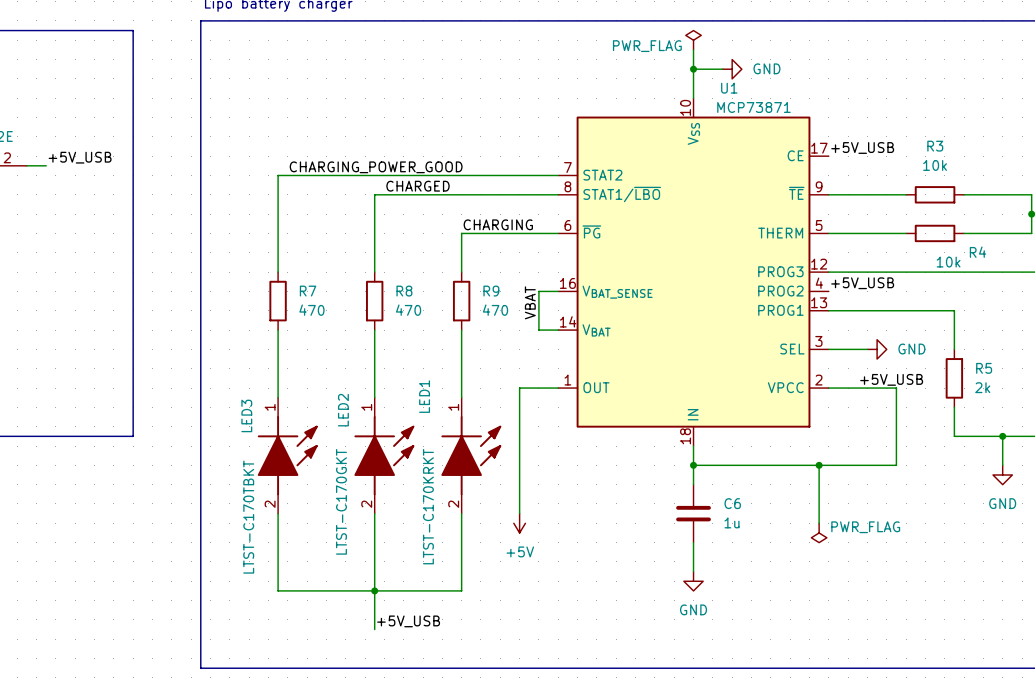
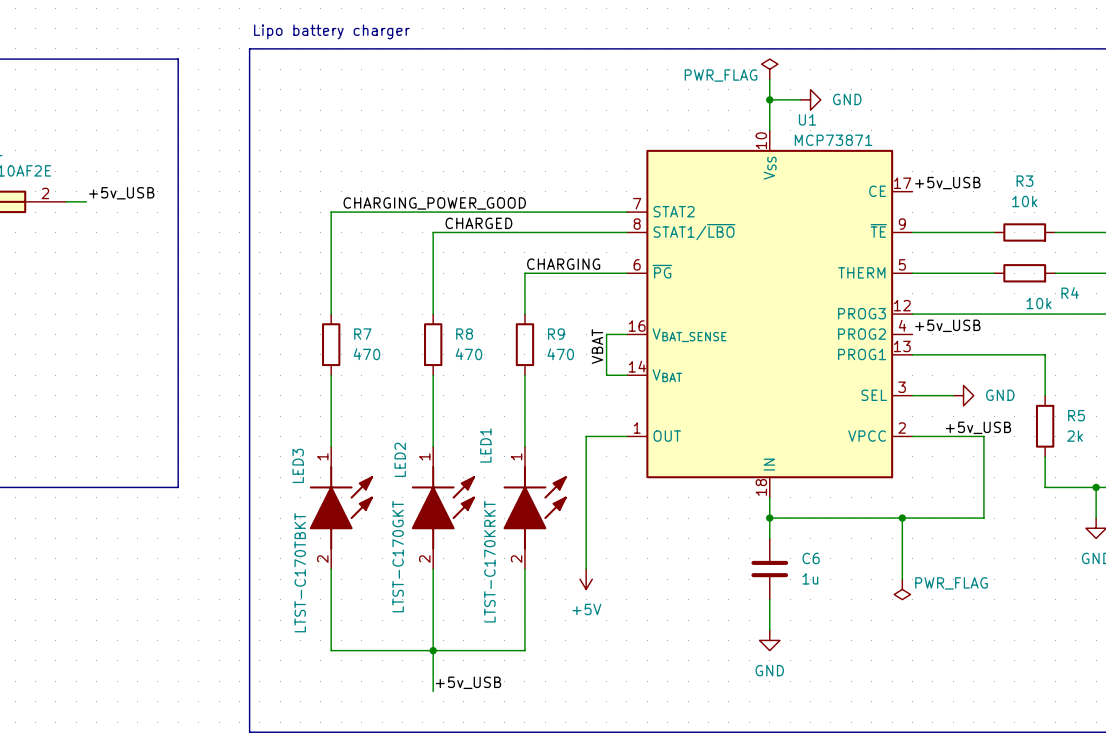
label: +5V_USB (862, 148) -> +5v_USB (947, 183)
label: +5V_USB (80, 157) -> +5v_USB (121, 193)
label: +5V_USB (862, 283) -> +5v_USB (947, 325)
label: +5V_USB (891, 379) -> +5v_USB (978, 427)
label: +5V_USB (408, 621) -> +5v_USB (468, 682)

